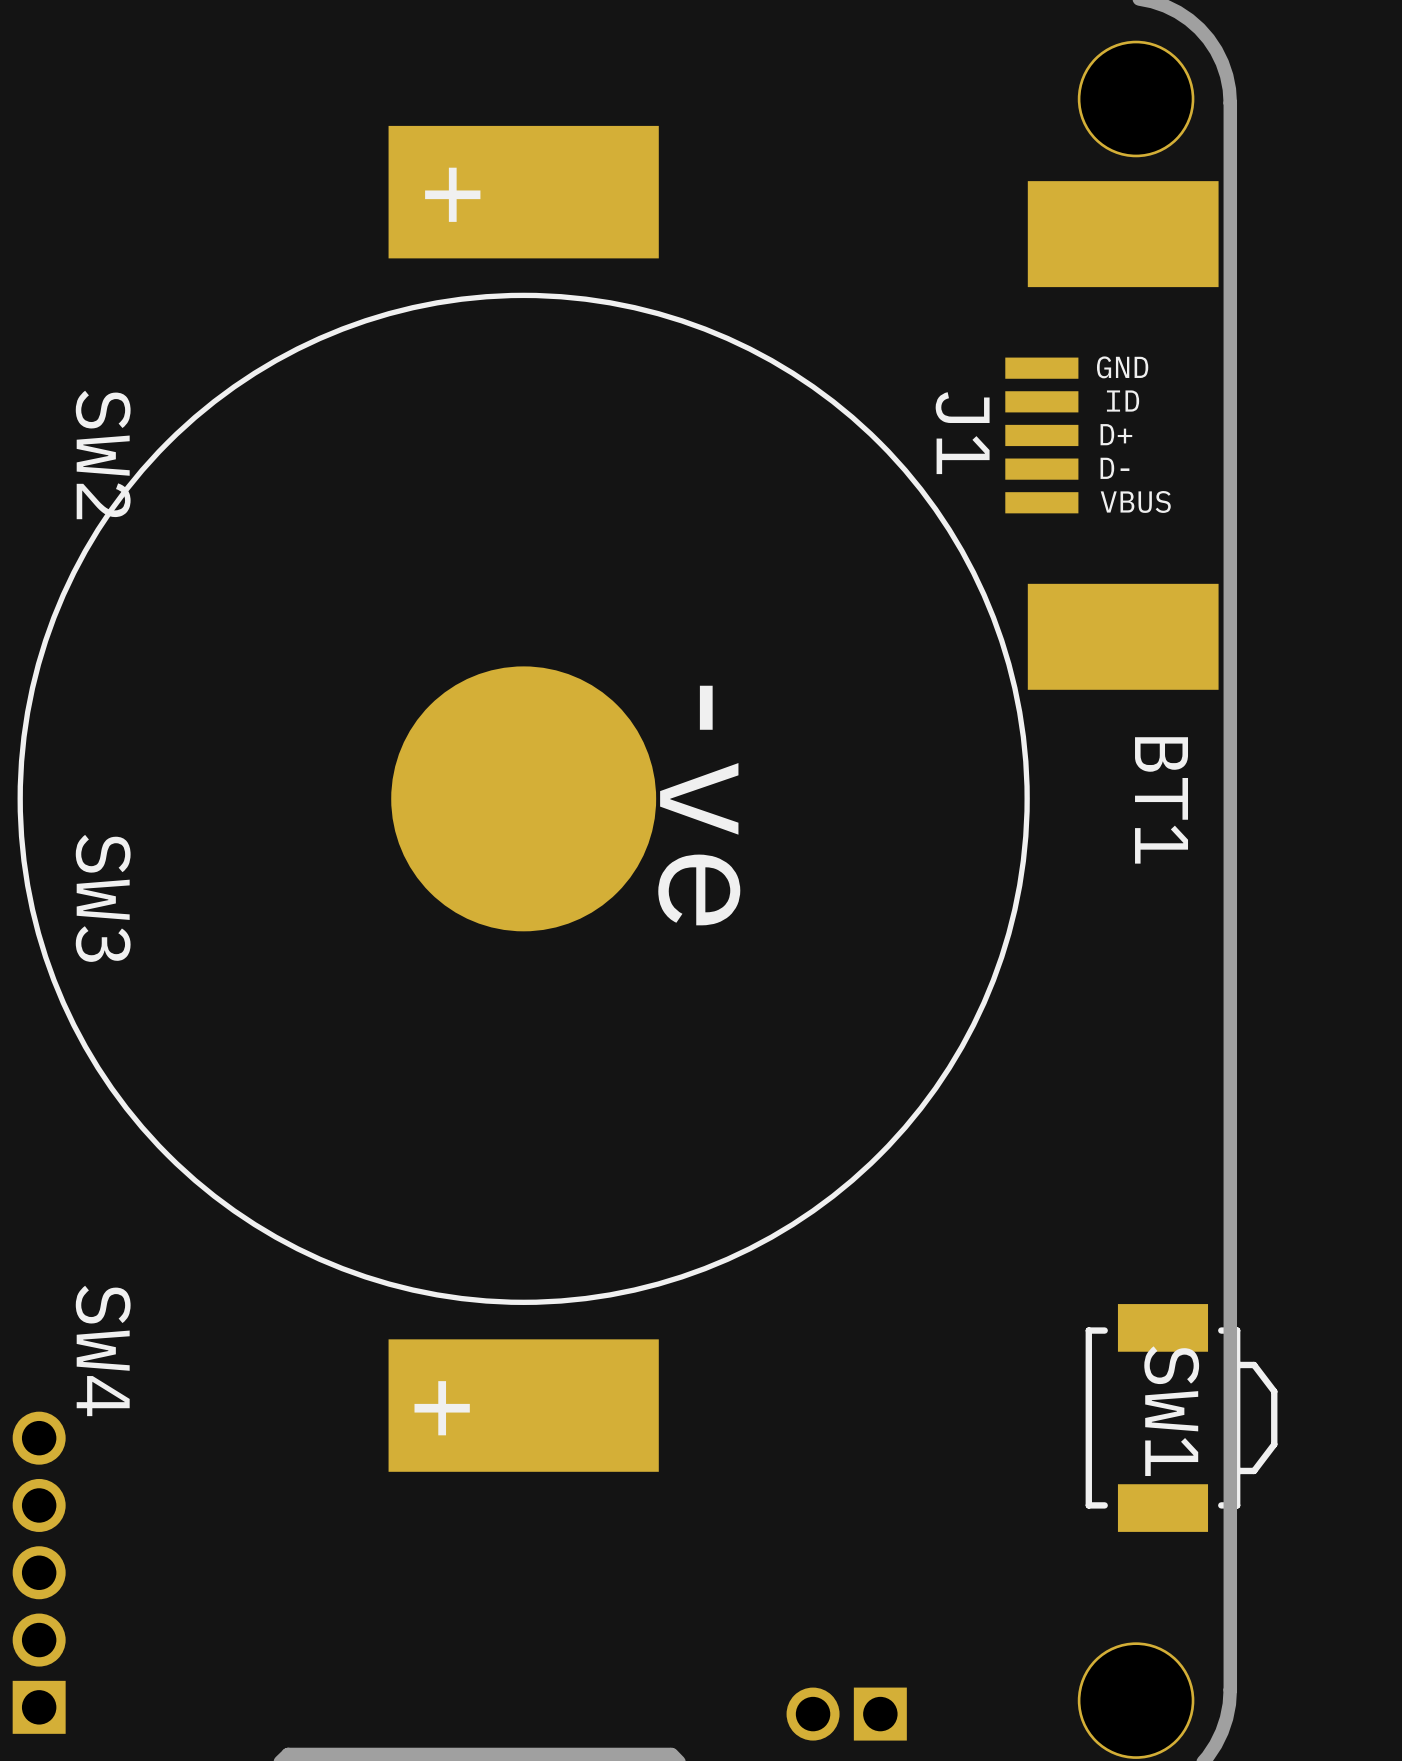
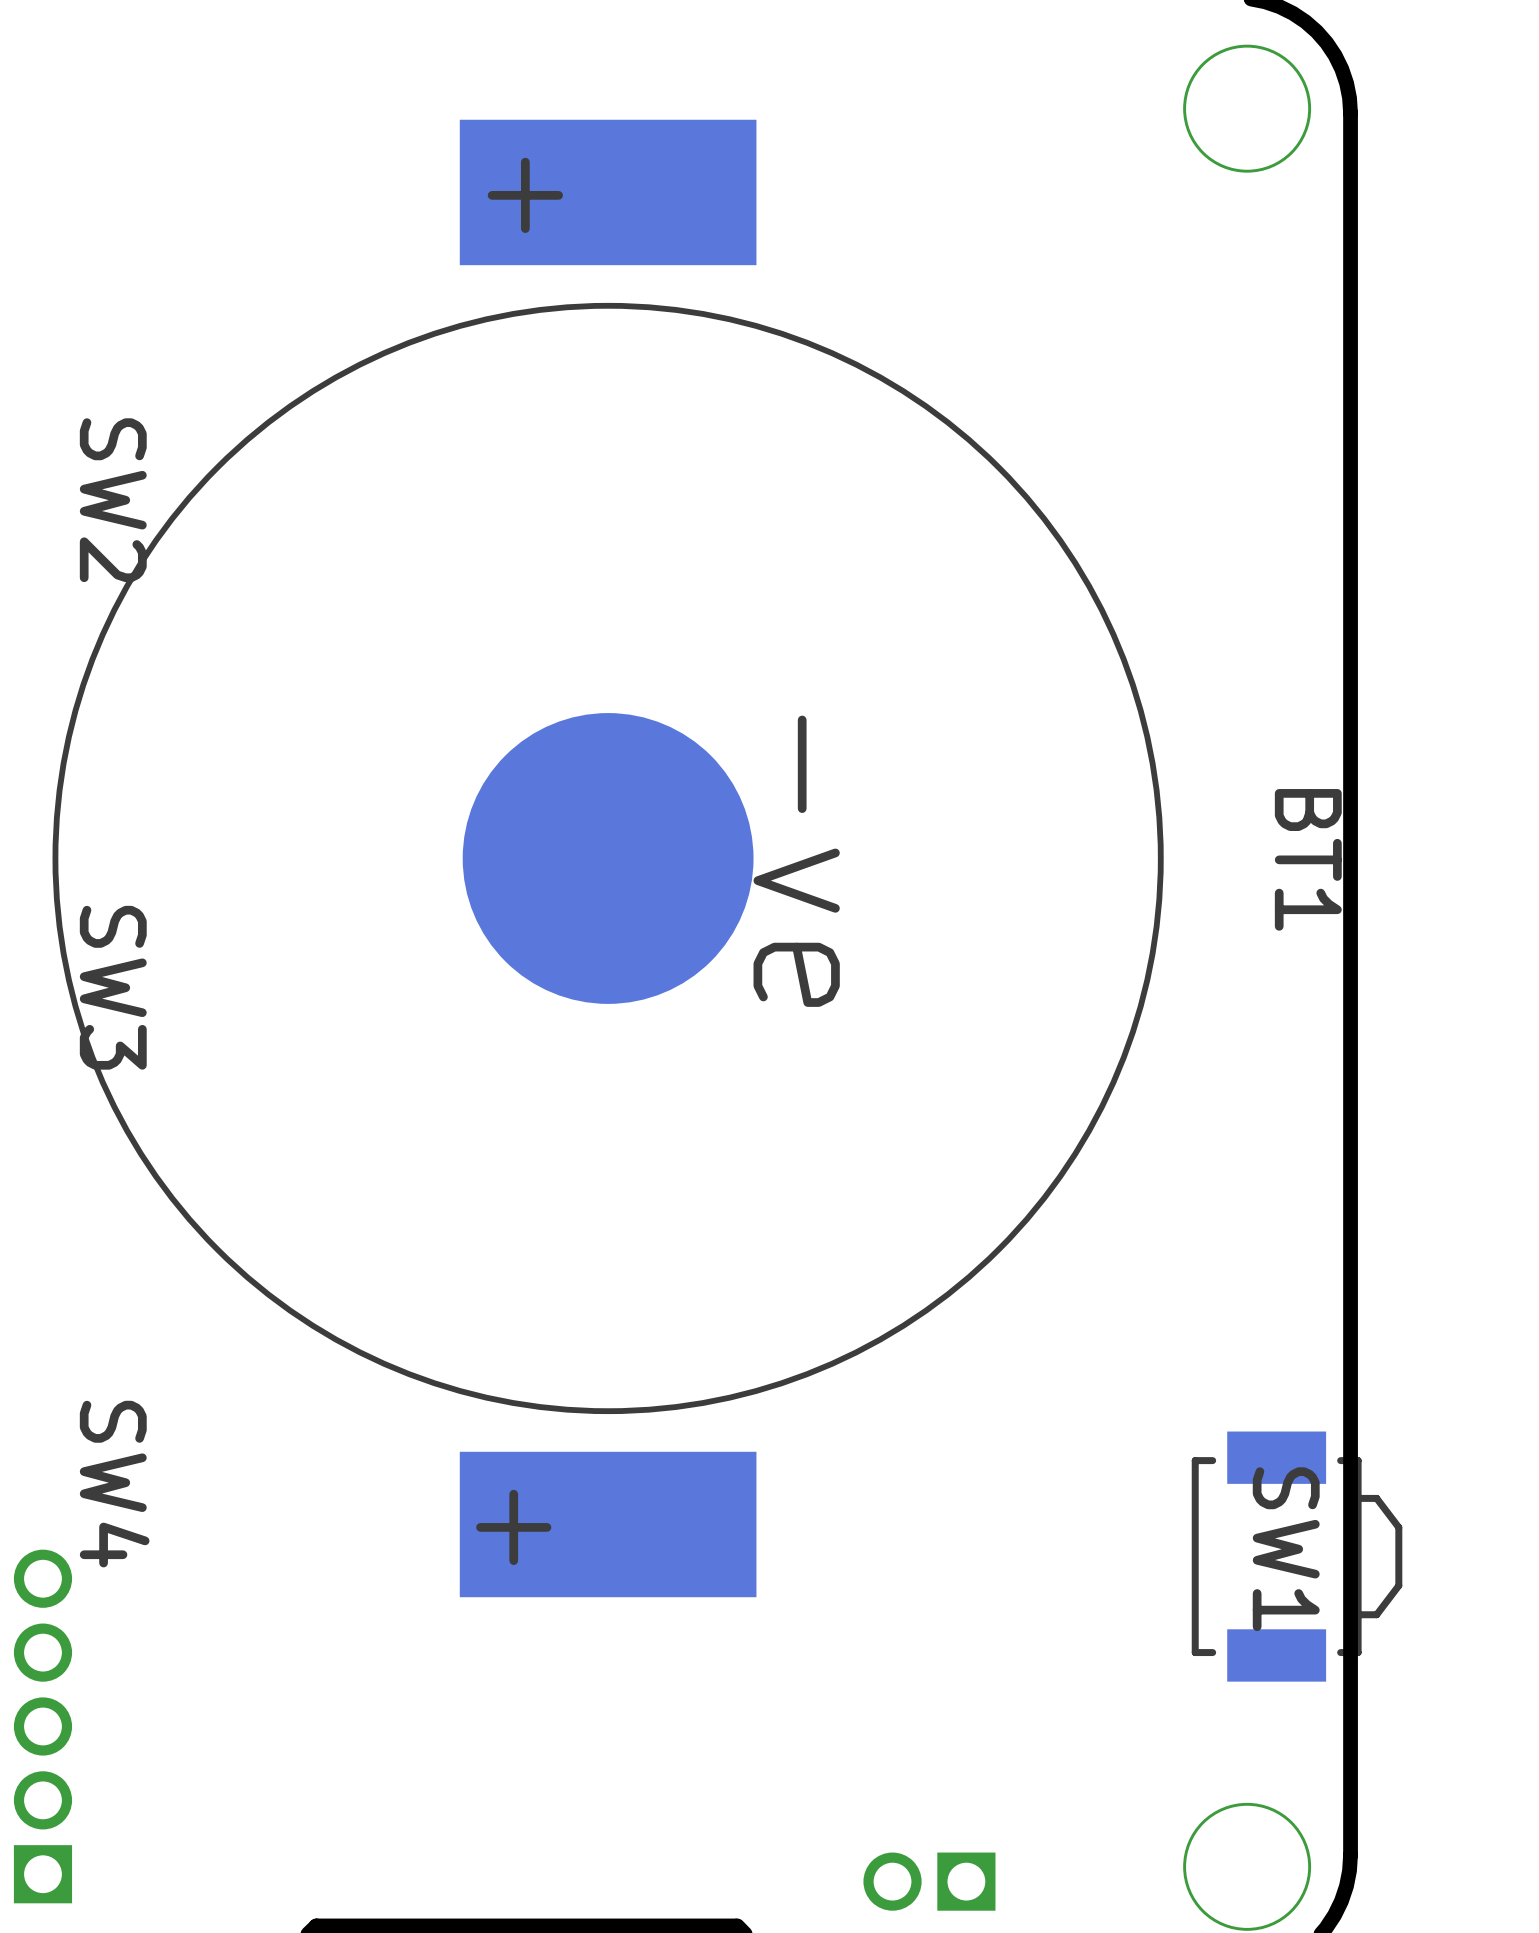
J1: (1111, 435) -> none
BT1 position: (523, 798) -> (608, 858)

